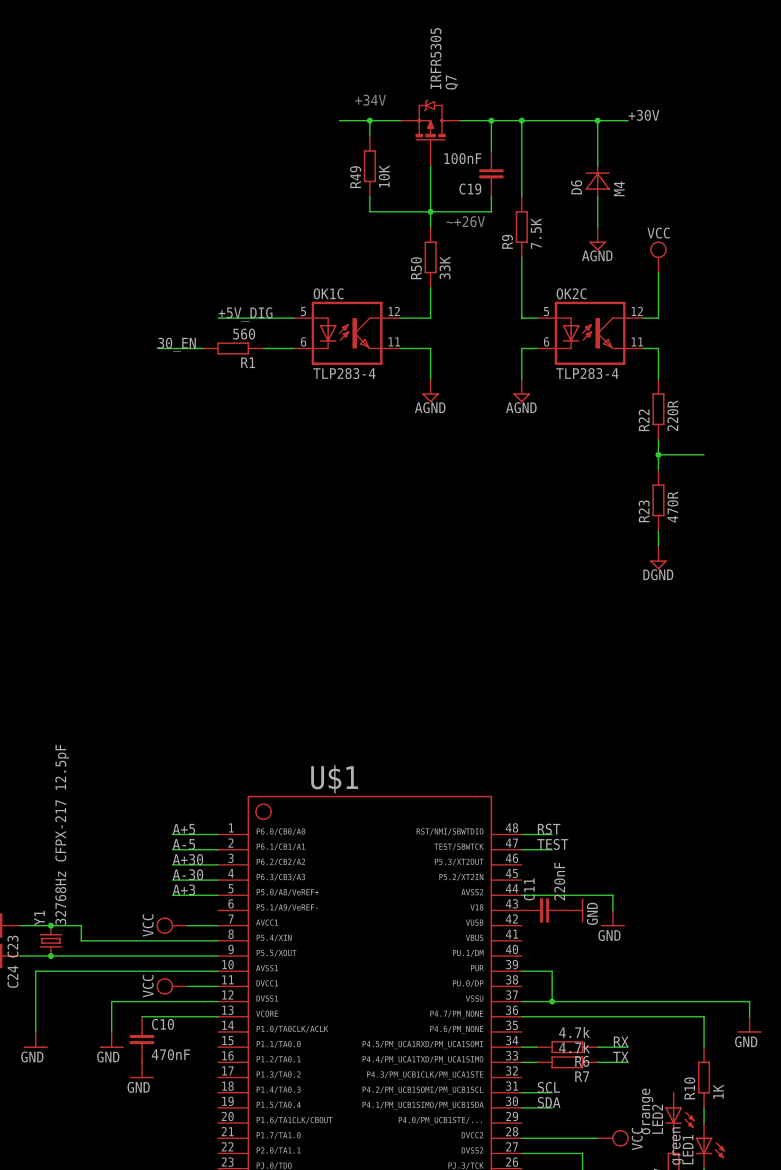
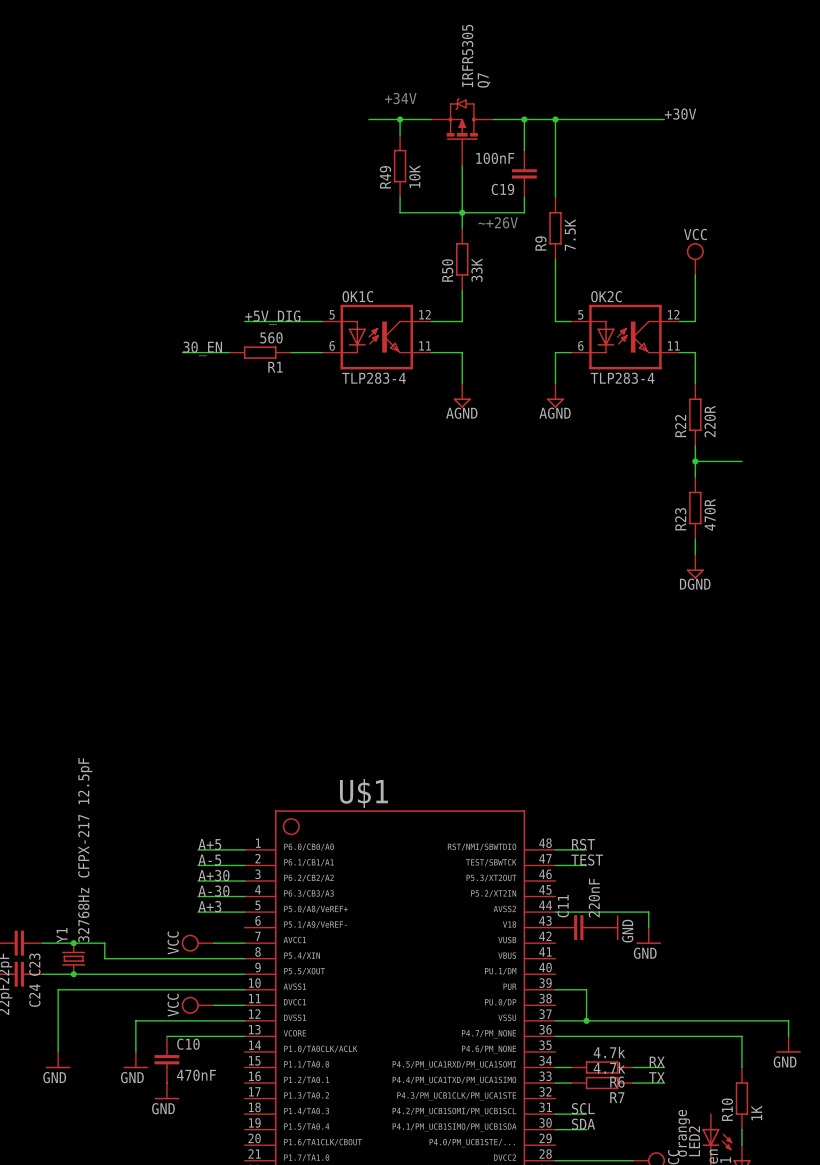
wire: (597, 120) (597, 166) -> none
junction: (597, 120) -> none
D6: M4 (597, 181) -> none
wire: (597, 196) (597, 226) -> none
power symbol: AGND (597, 238) -> none

